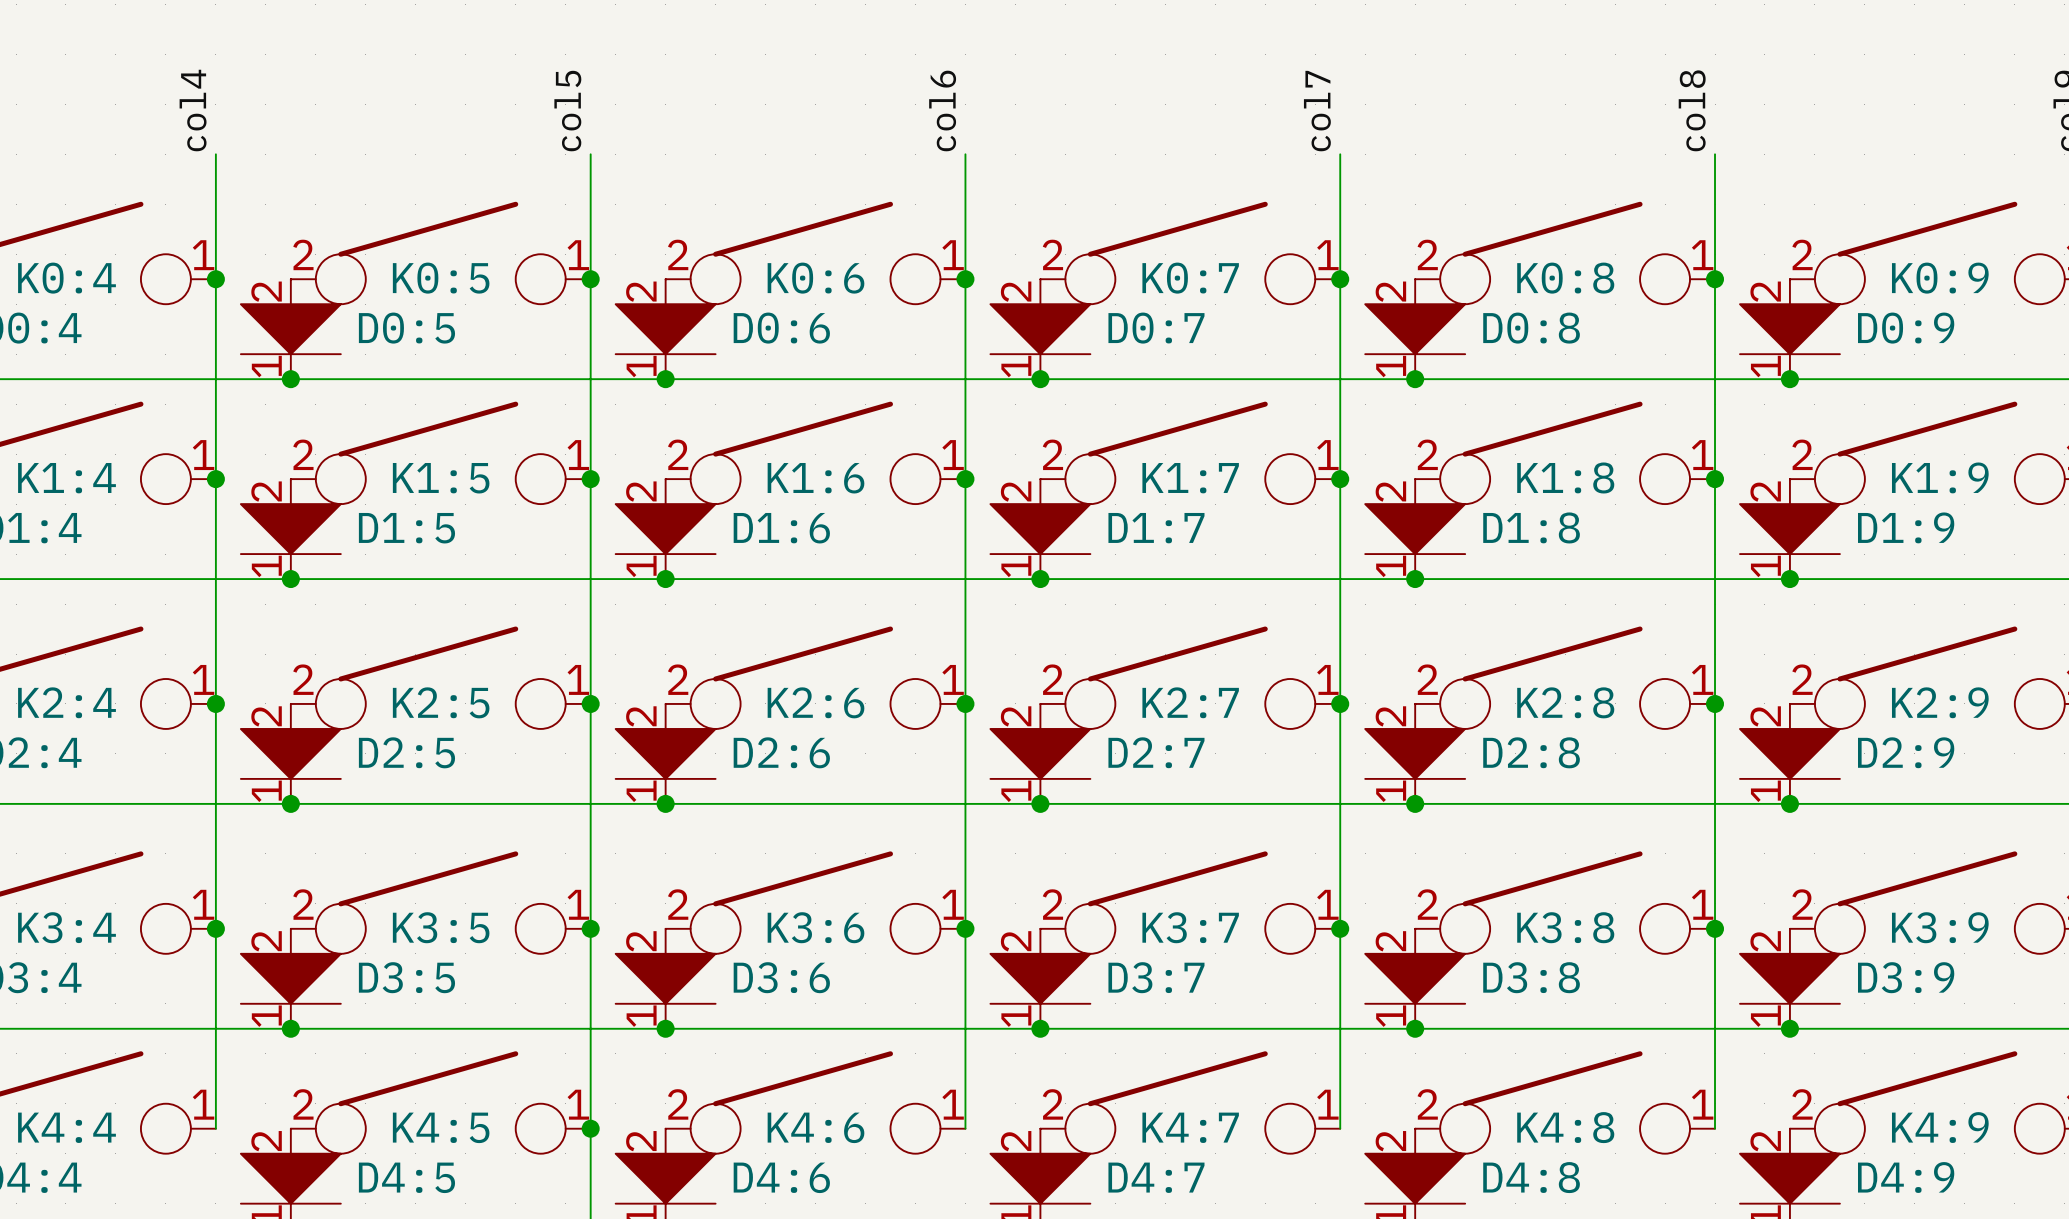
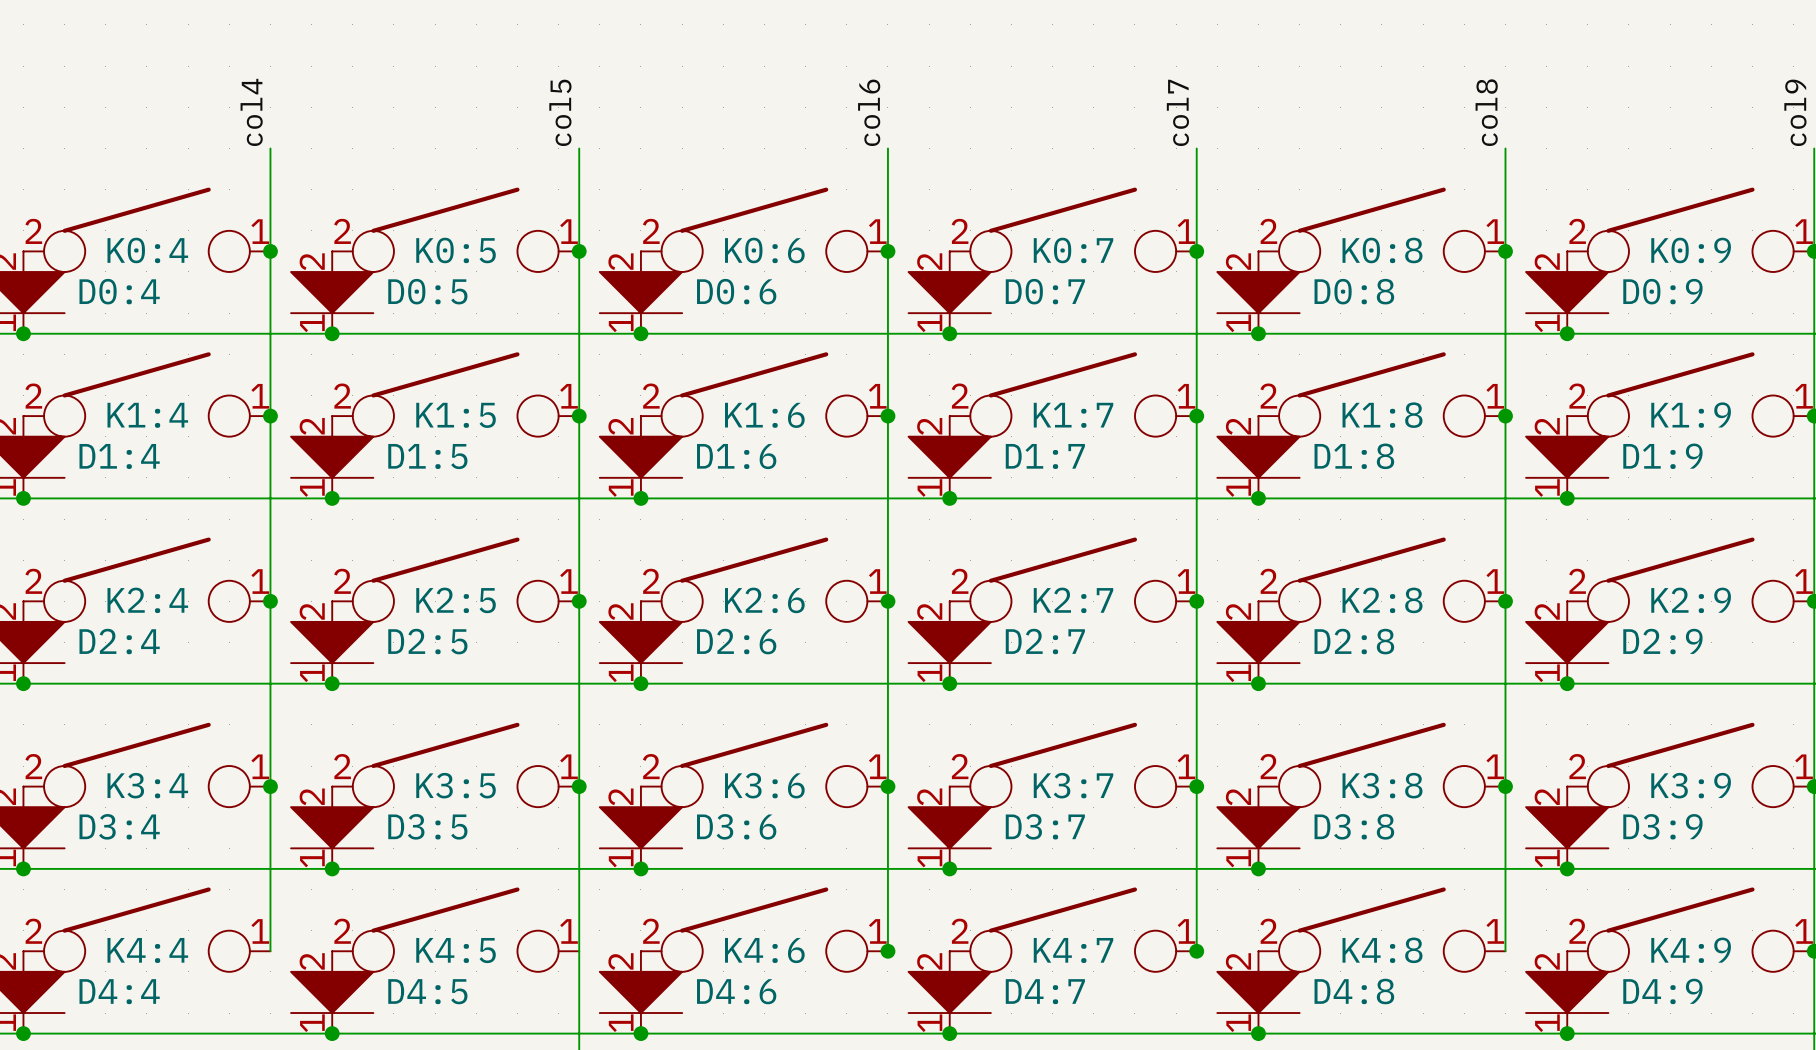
junction: (590, 1128) -> none
junction: none -> (887, 951)
junction: none -> (1196, 951)

